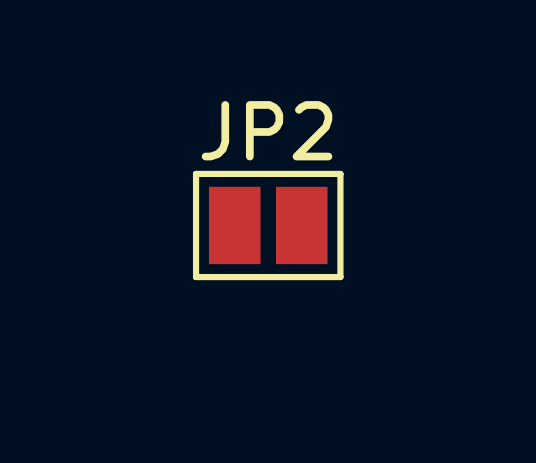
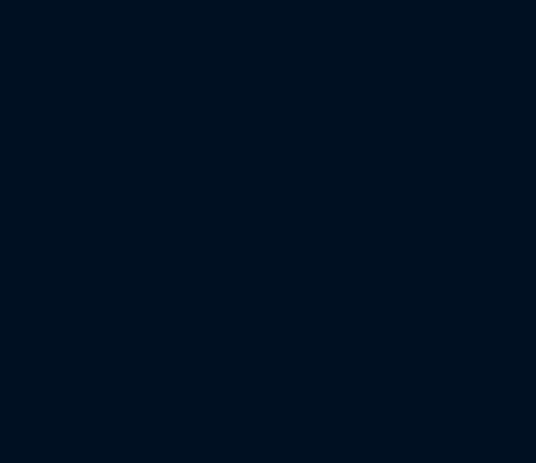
JP2: (268, 225) -> none

